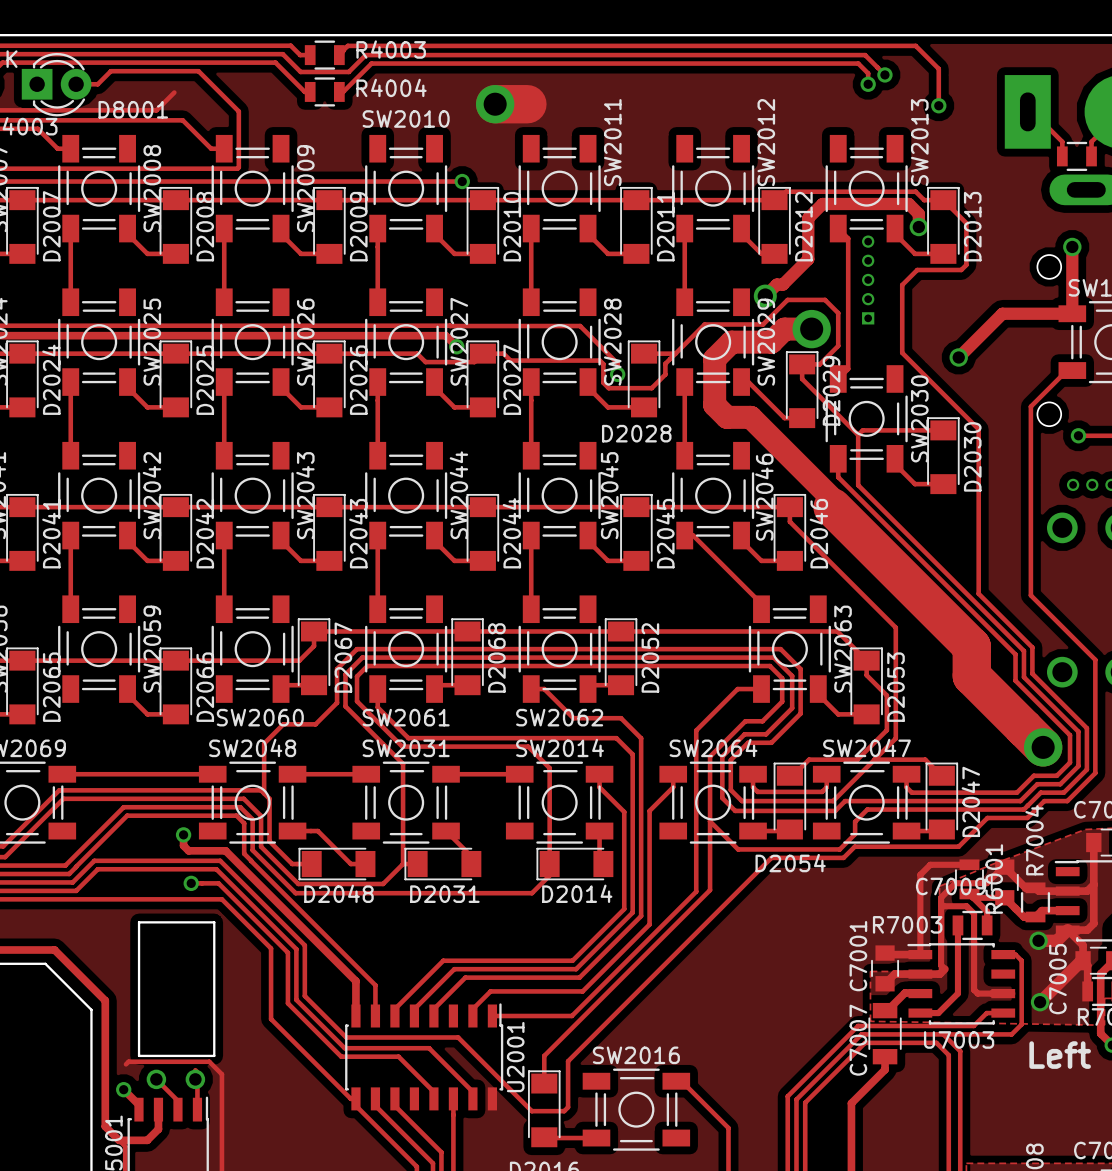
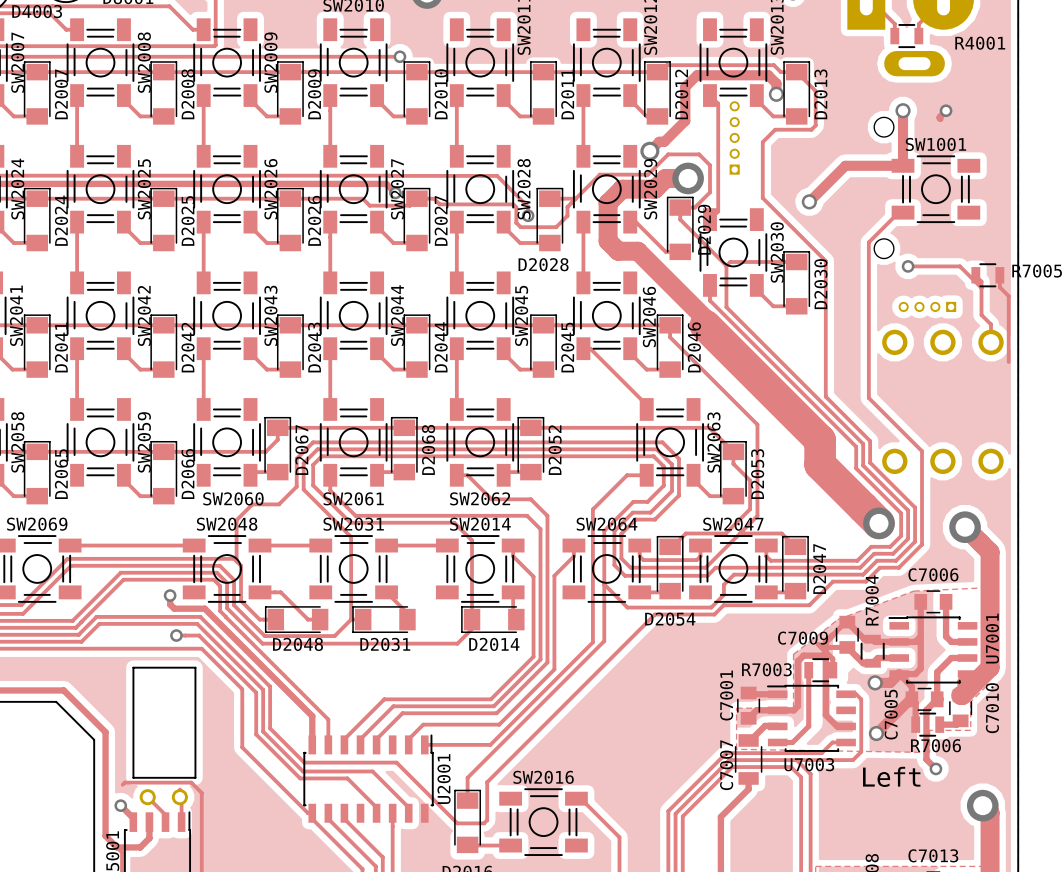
track: (969, 864) (930, 864) (920, 874) (920, 954) -> none
zone outline: (993, 864) (939, 886) (939, 906) -> (837, 619) (793, 654)
R6001: (969, 879) -> none
track: (986, 883) (955, 883) (941, 897) (941, 965) (944, 969) -> (825, 658) (822, 655) (803, 655) (797, 661) (797, 706)
track: none -> (832, 635) (825, 642) (825, 715) (837, 726)
track: (941, 903) (943, 906) (966, 906) (974, 913) (974, 989) (977, 993) (1003, 993) -> none

